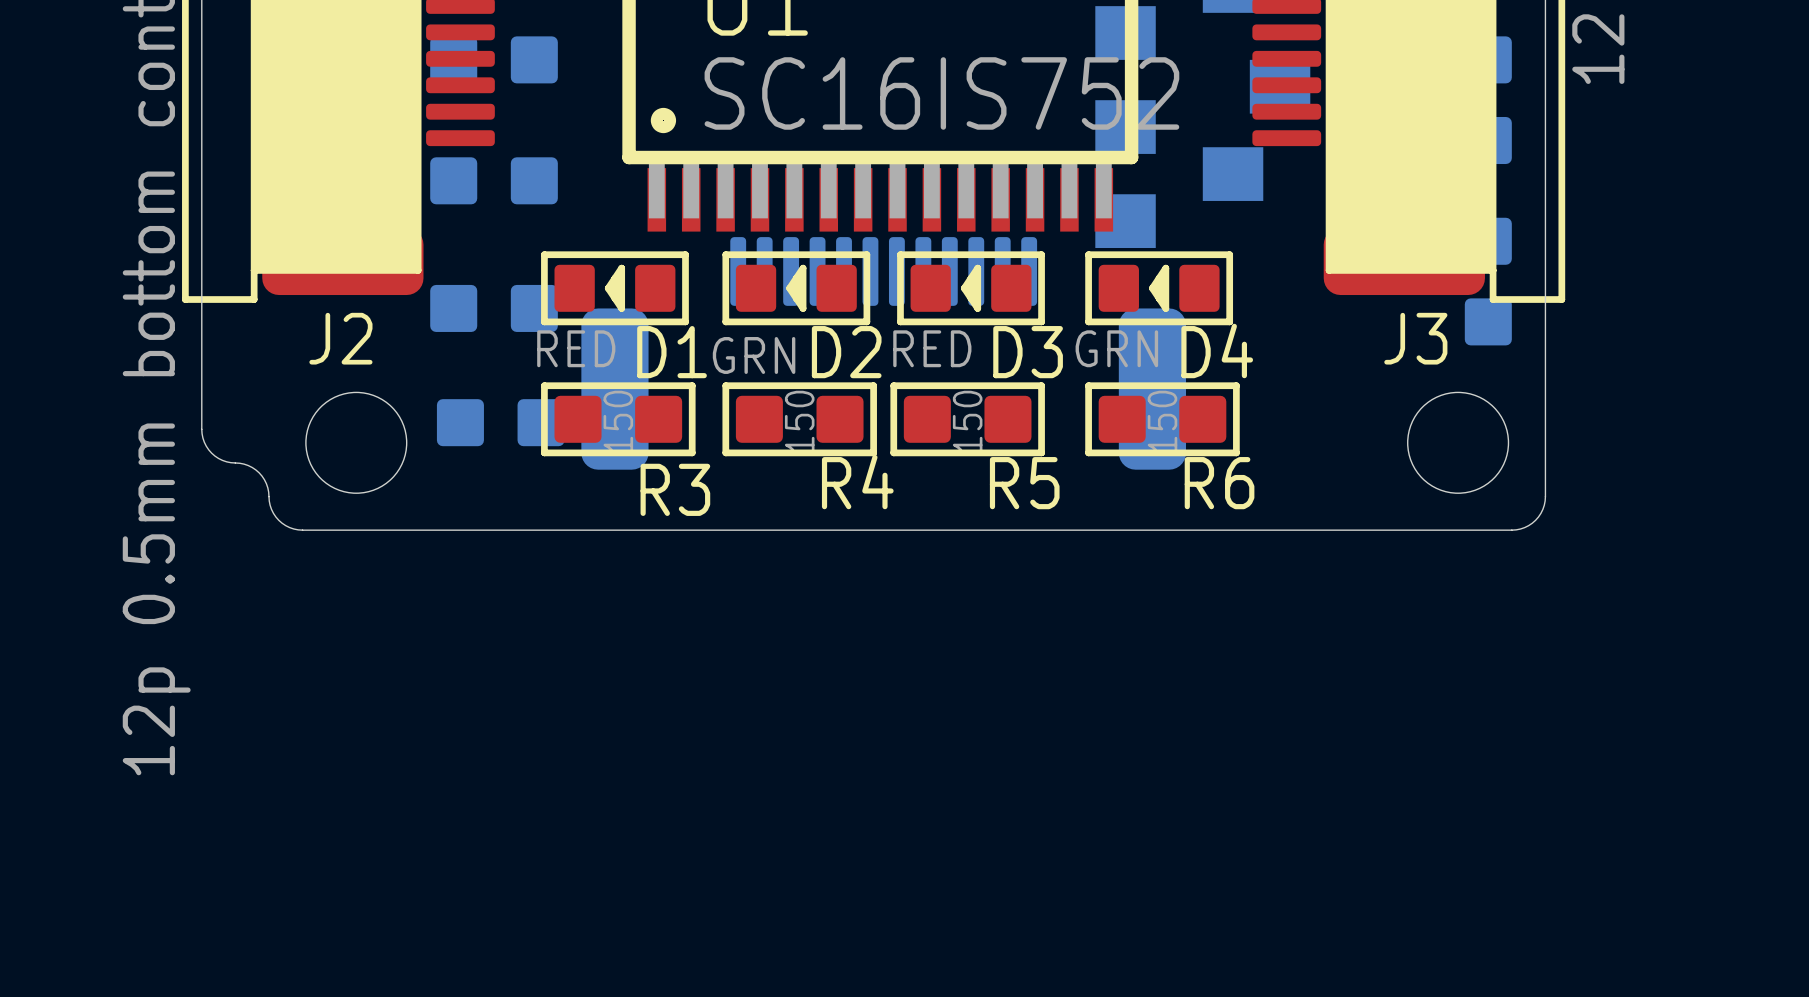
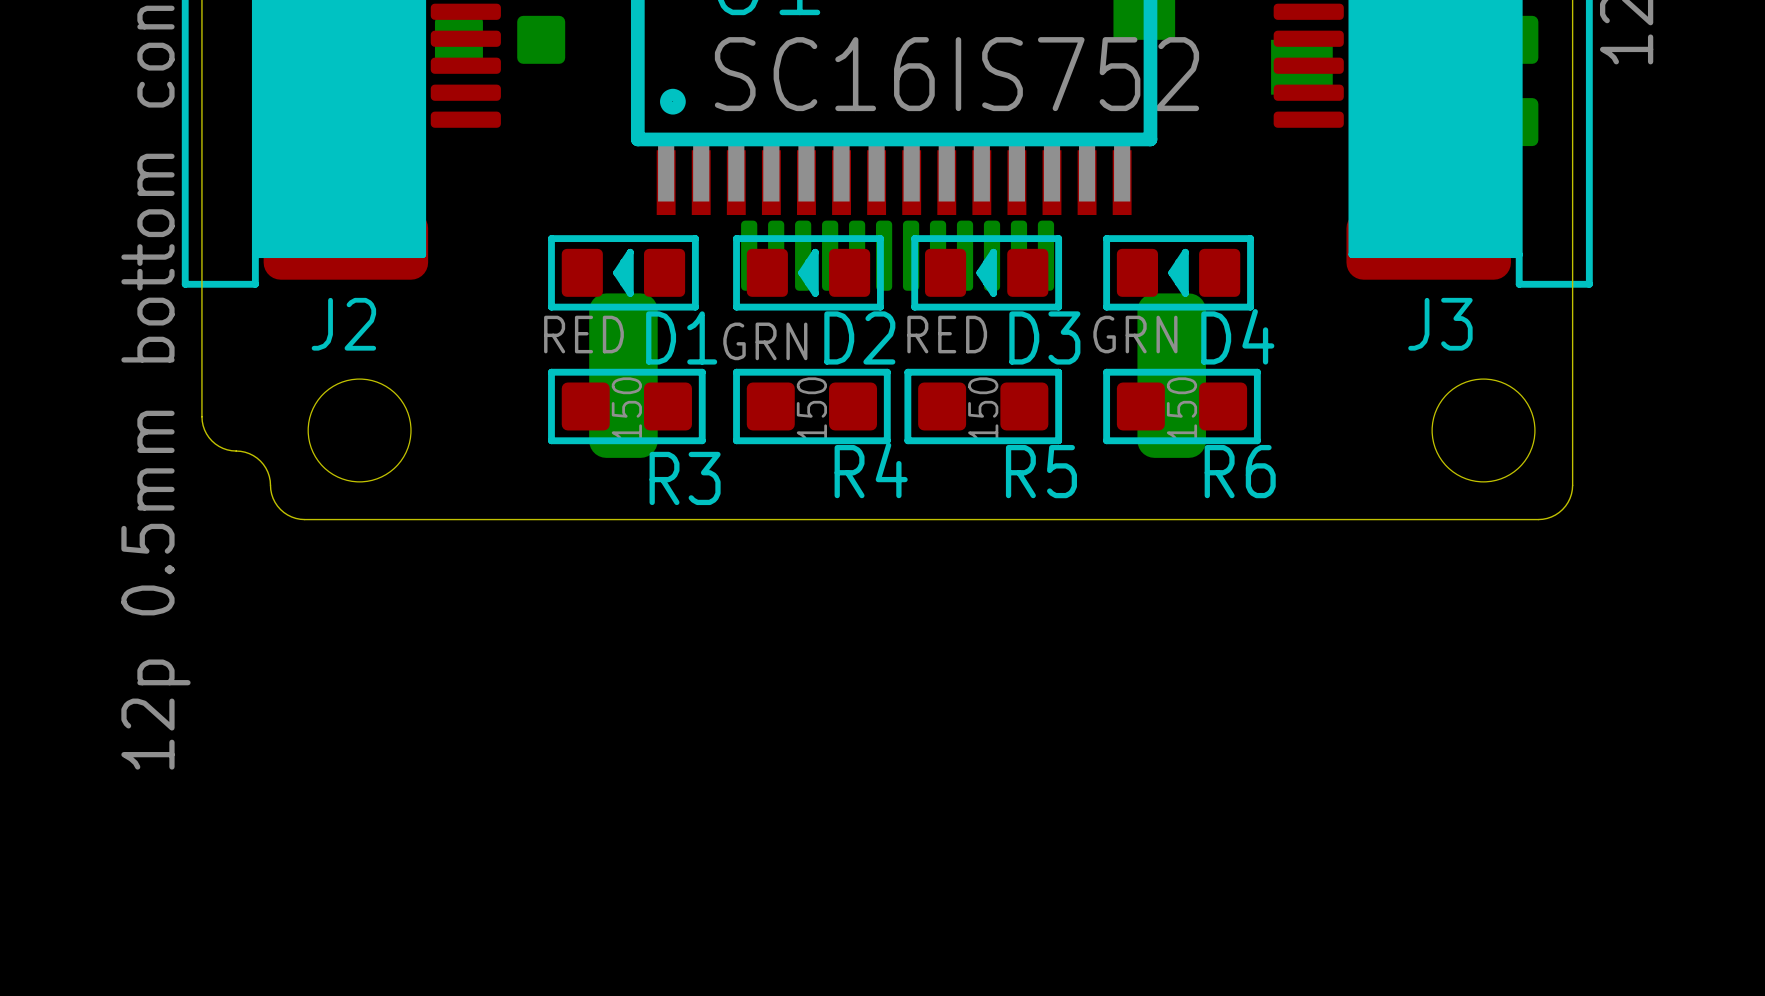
part: (1179, 174) -> none
part: (494, 180) -> none
part: (1488, 281) -> none
part: (494, 308) -> none
part: (500, 422) -> none

